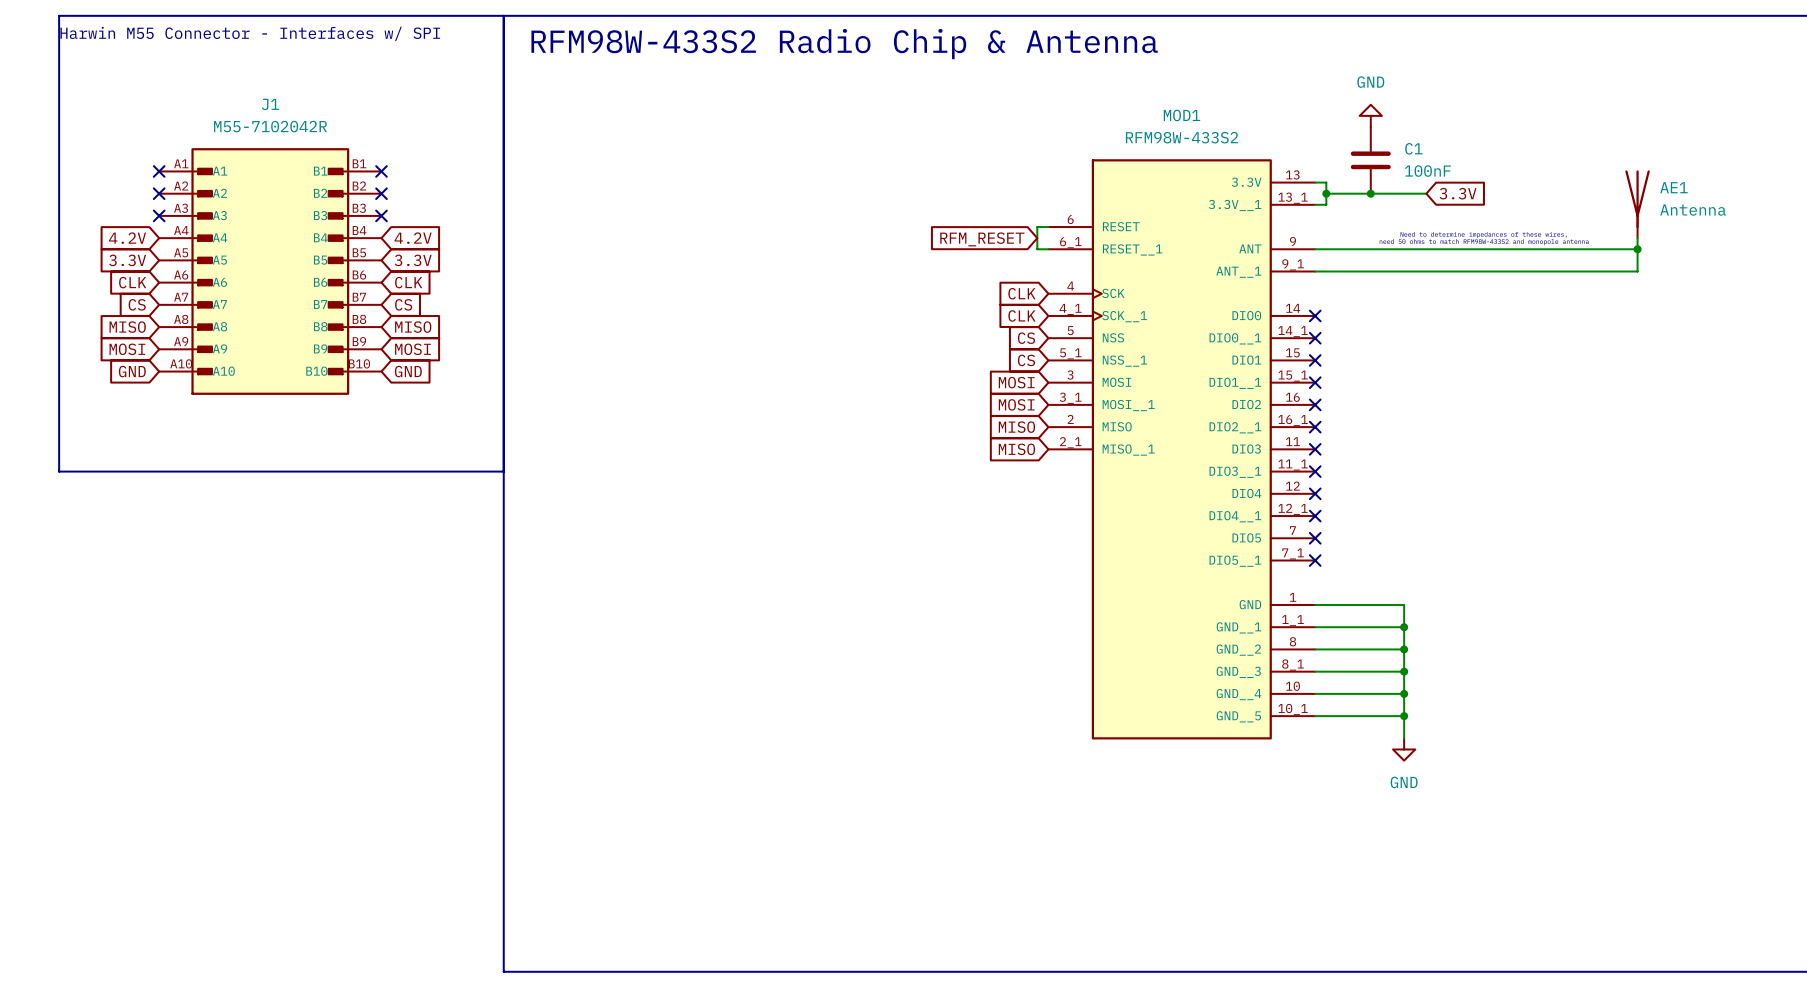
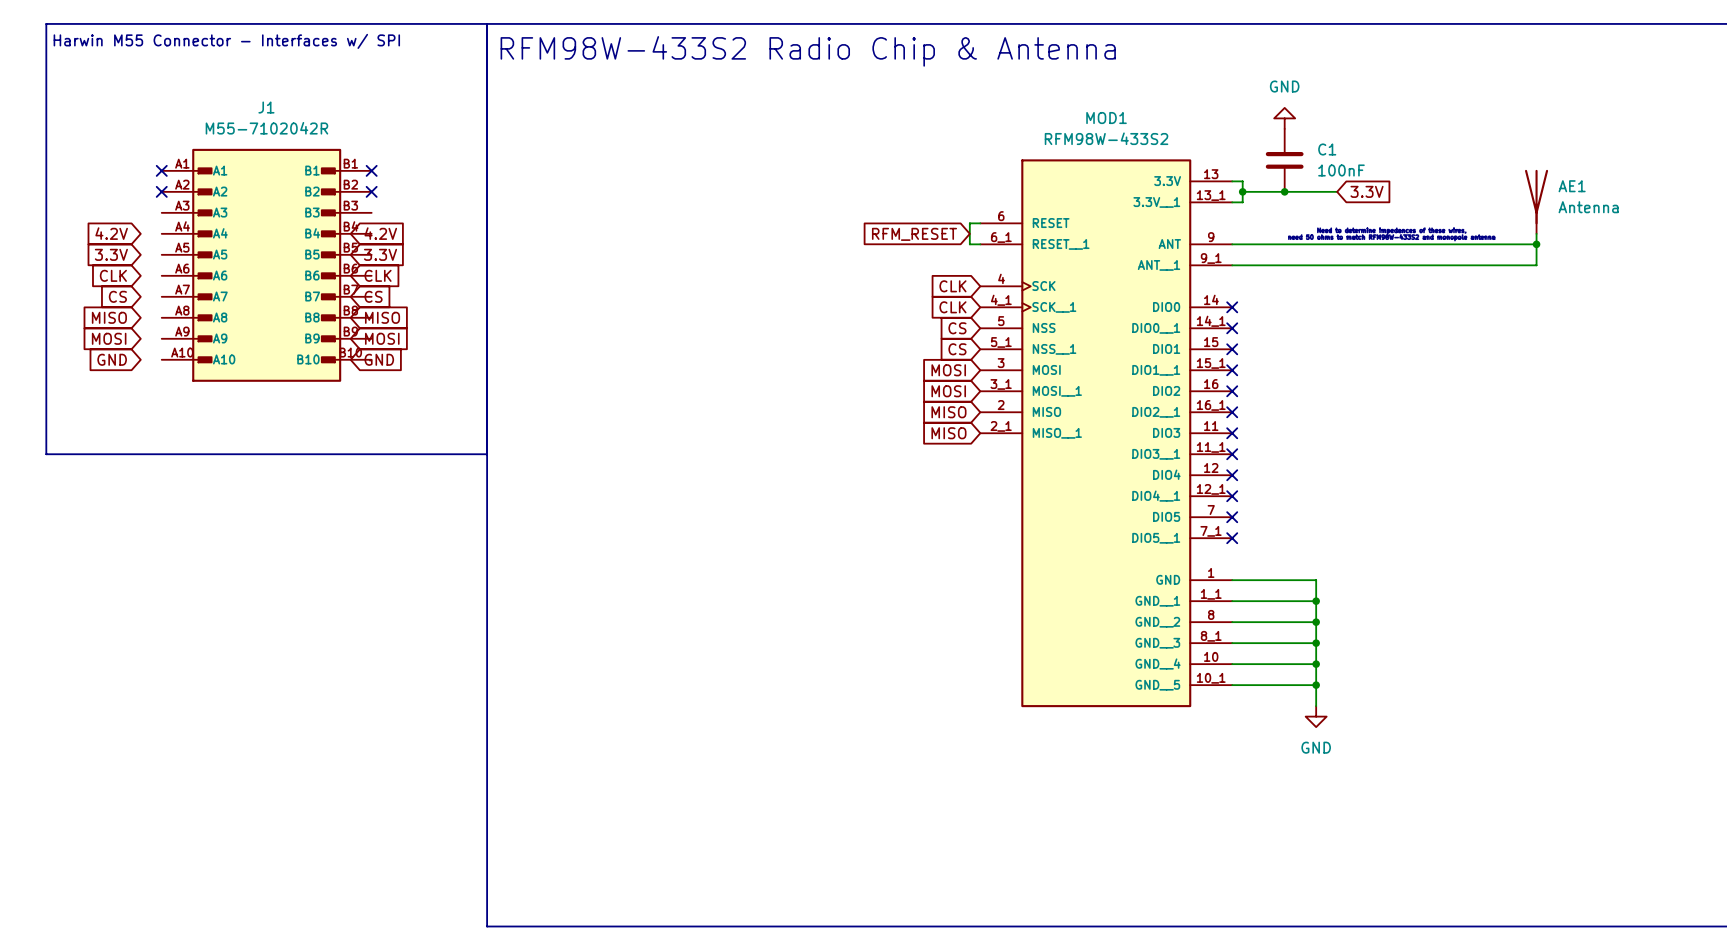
line: (503, 15) (503, 971) (525, 971) -> (487, 23) (487, 926)
text position: RFM98W-433S2 Radio Chip & Antenna (844, 44) -> RFM98W-433S2 Radio Chip & Antenna (808, 51)
no-connect mark: (159, 171) -> none
no-connect mark: none -> (161, 170)
no-connect mark: (381, 171) -> none
no-connect mark: none -> (371, 170)
no-connect mark: (159, 193) -> none
no-connect mark: none -> (161, 191)
no-connect mark: (381, 193) -> none
no-connect mark: none -> (371, 191)
no-connect mark: (159, 215) -> none
no-connect mark: (381, 215) -> none
J1 position: (270, 271) -> (266, 265)
line: none -> (466, 454) (487, 454)

